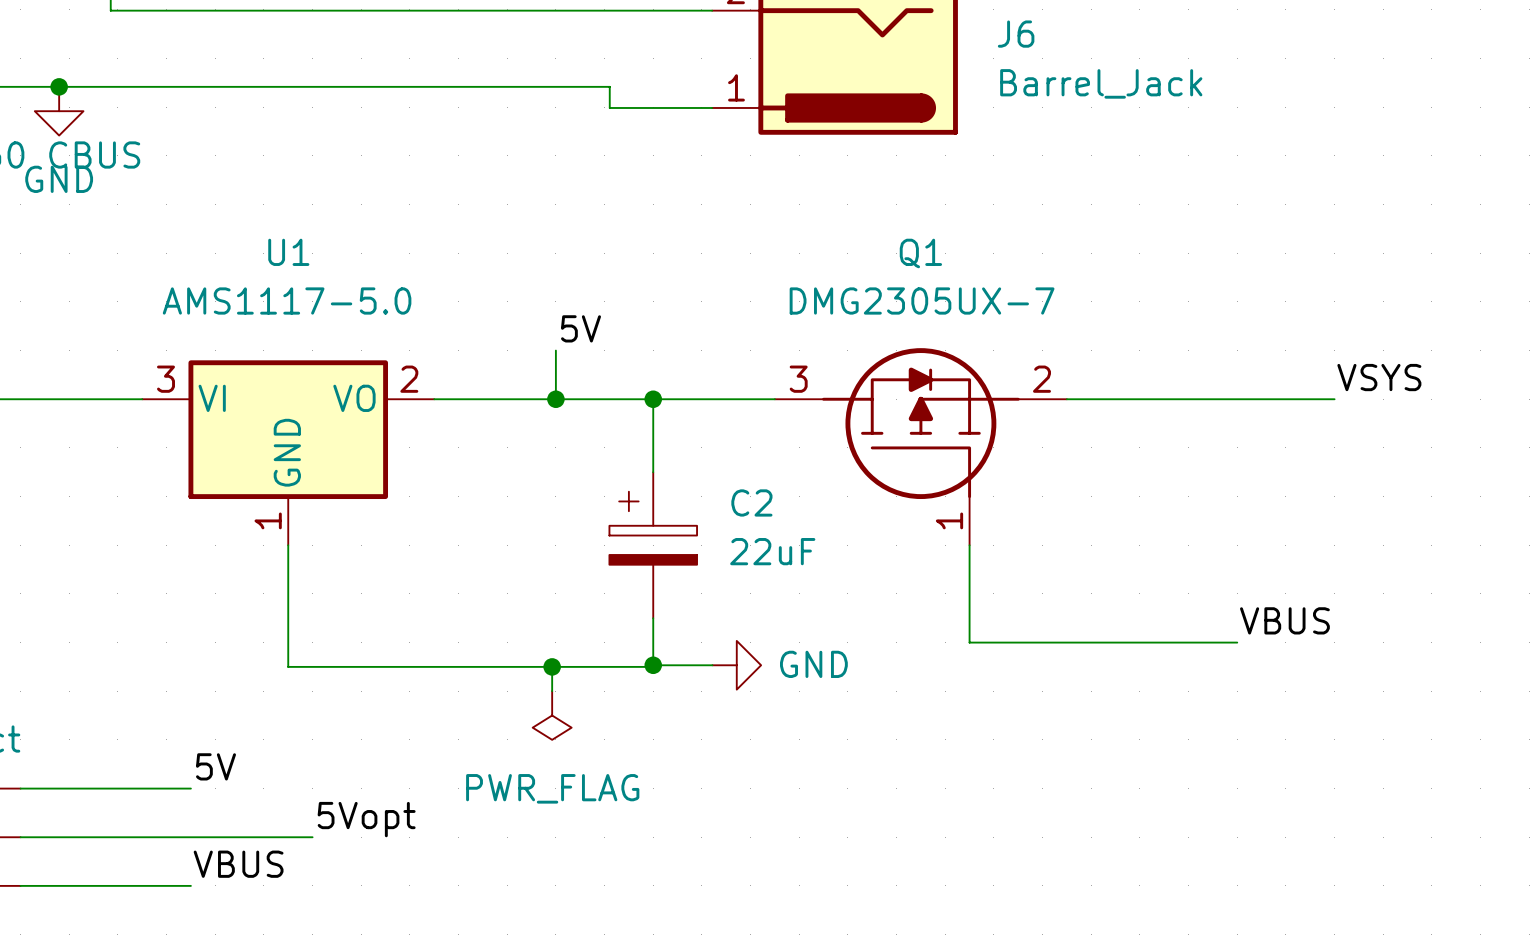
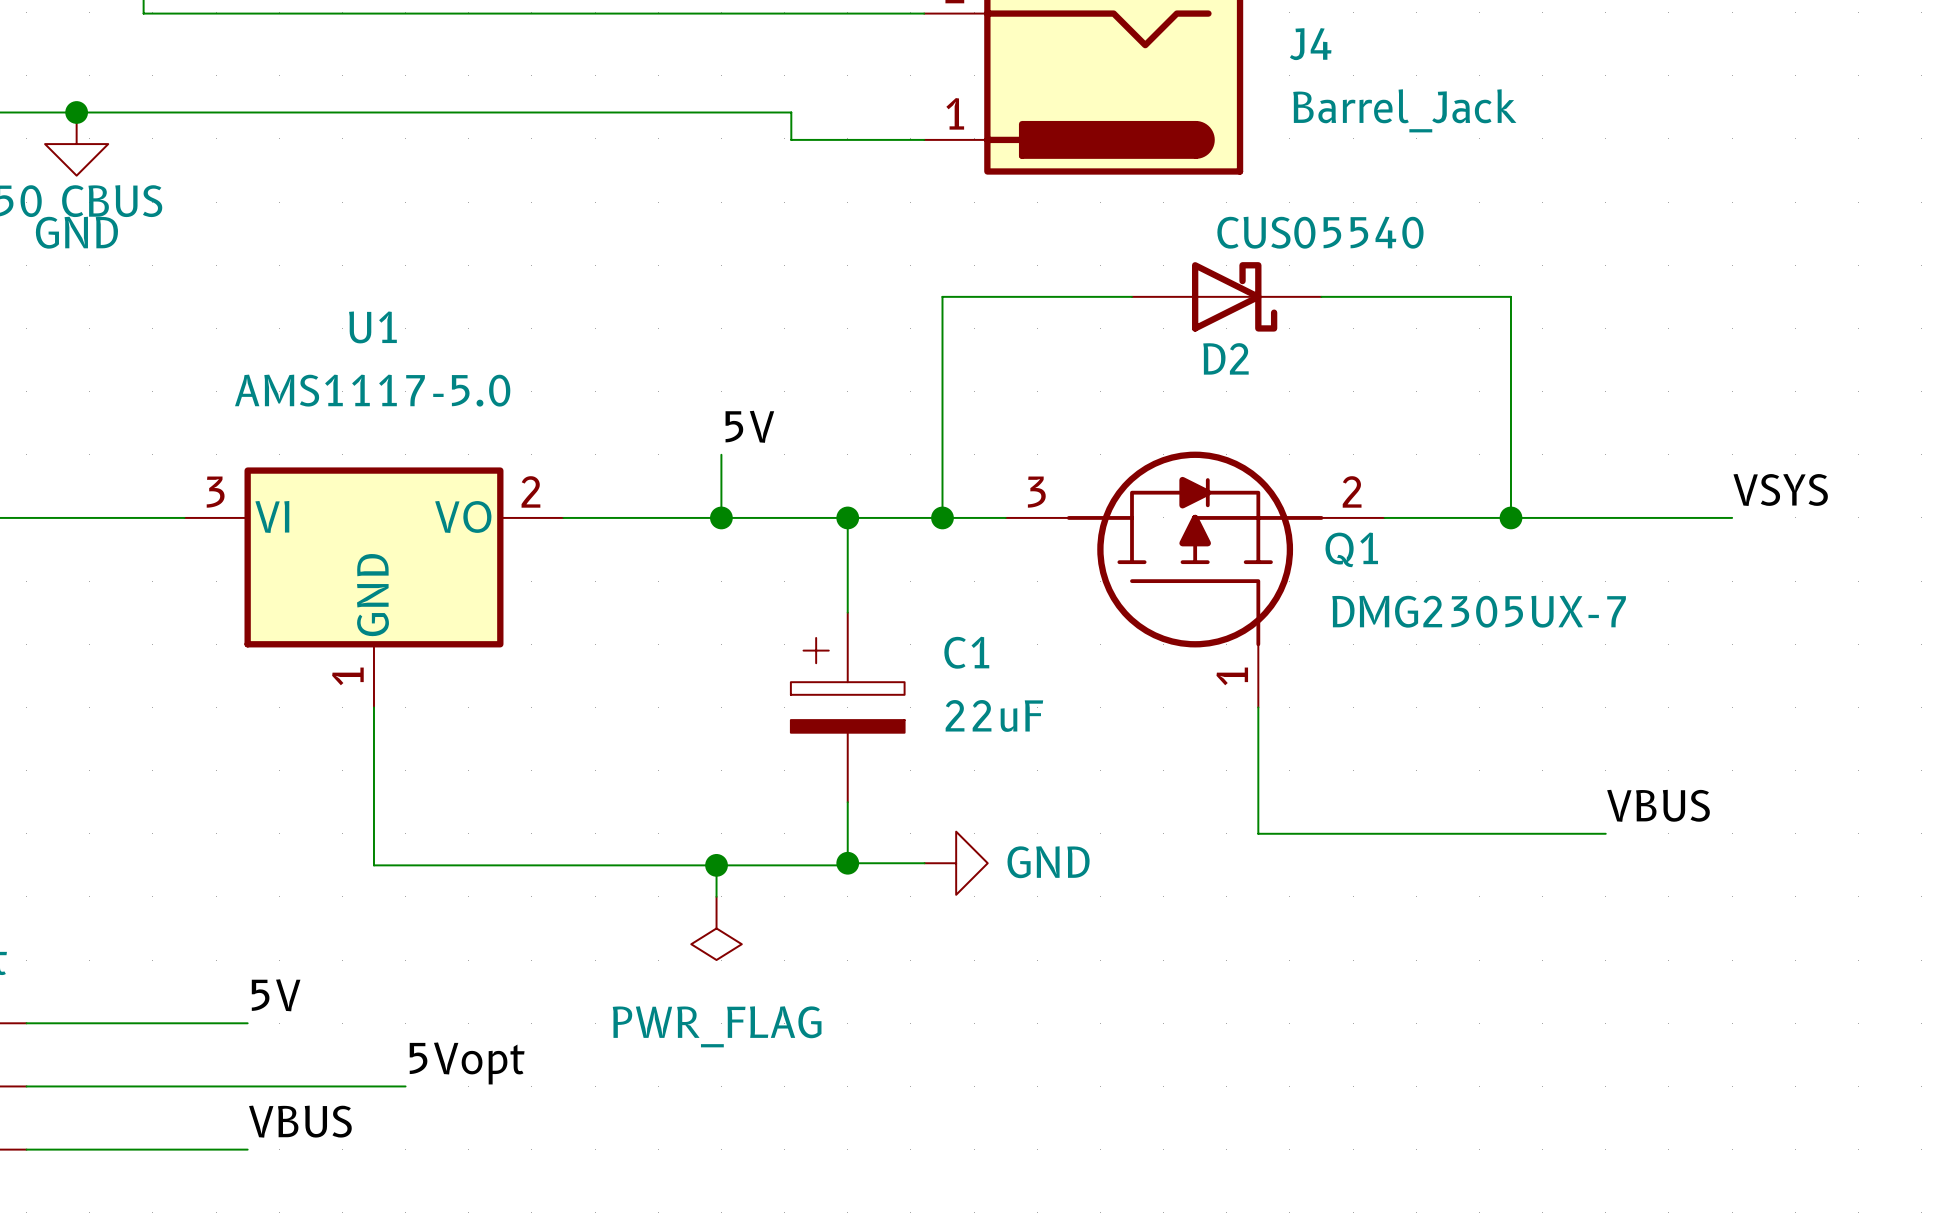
J6 name: J6 (1016, 34) -> J4 (1310, 44)
wire: none -> (1131, 296) (942, 296) (942, 517)
D2: none -> CUS05540 (1226, 296)
wire: none -> (1321, 296) (1510, 296) (1510, 517)
Q1 name position: Q1 (920, 253) -> Q1 (1351, 549)
Q1 value position: DMG2305UX-7 (922, 301) -> DMG2305UX-7 (1479, 611)
junction: none -> (942, 517)
junction: none -> (1510, 517)
C2 name: C2 (751, 502) -> C1 (966, 652)

